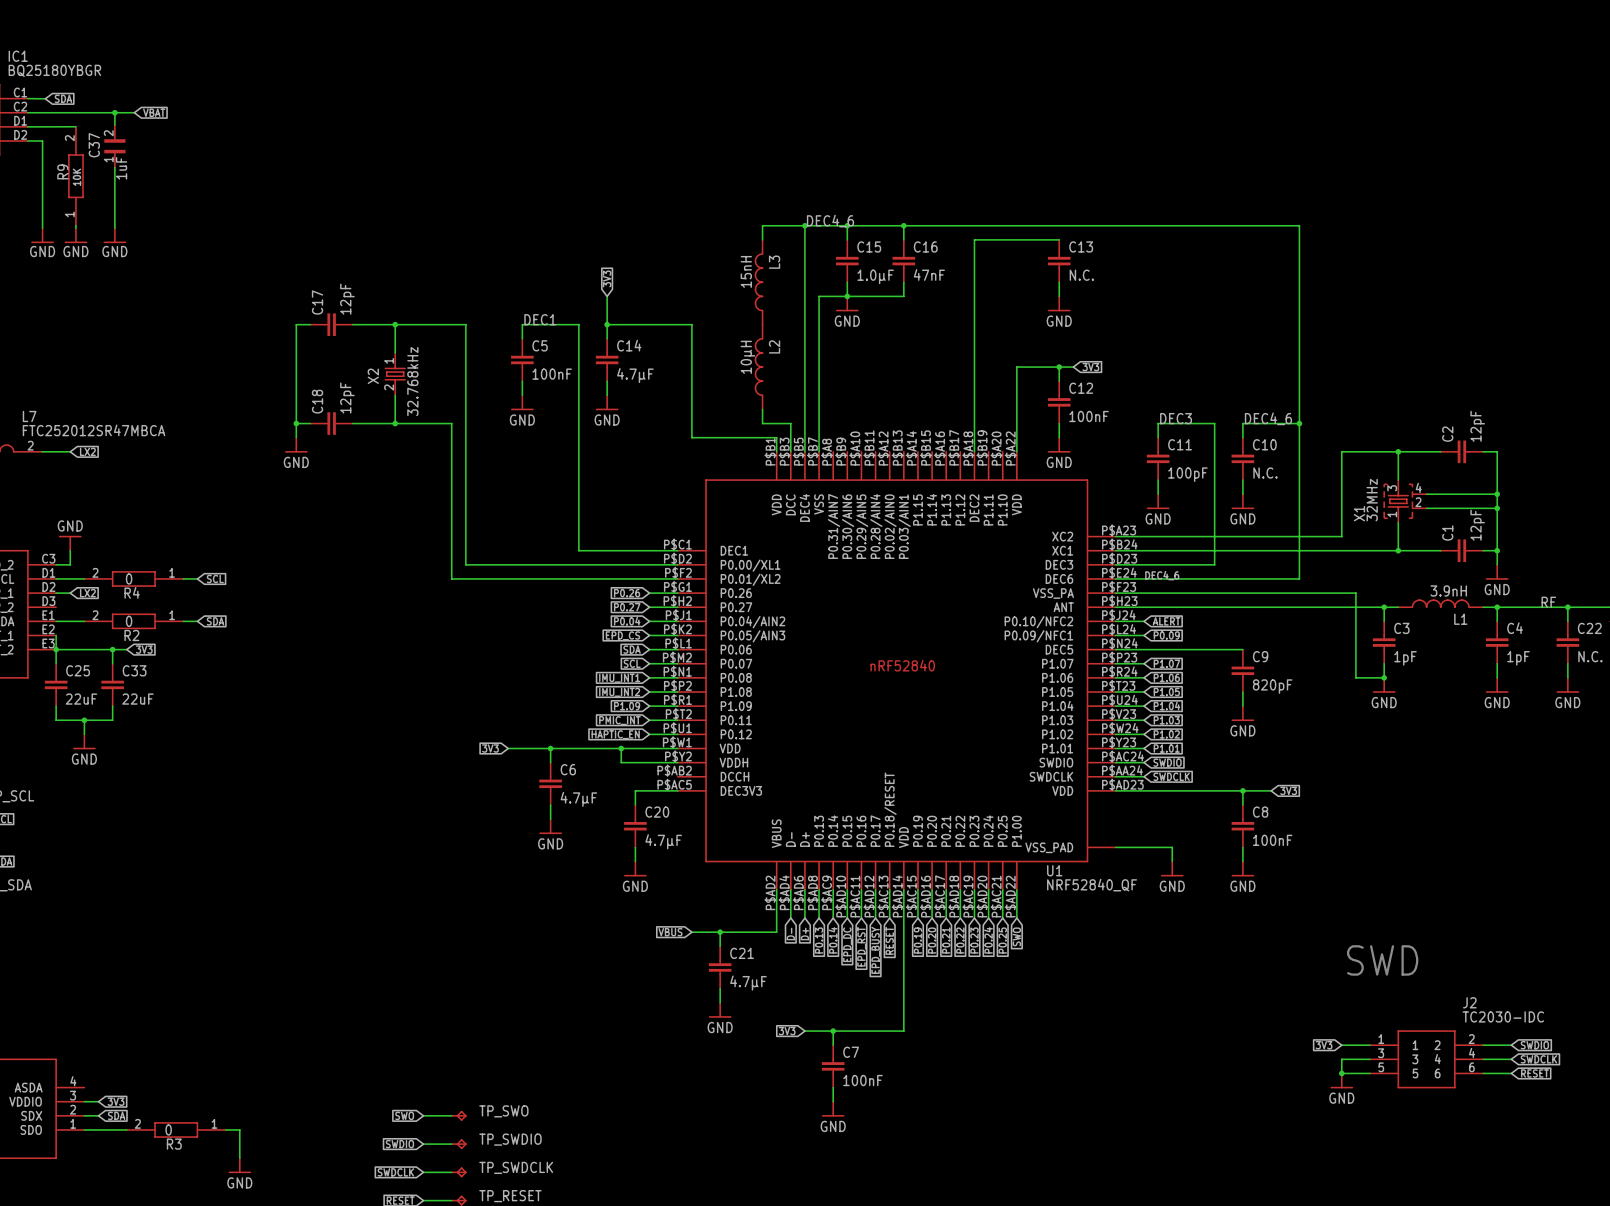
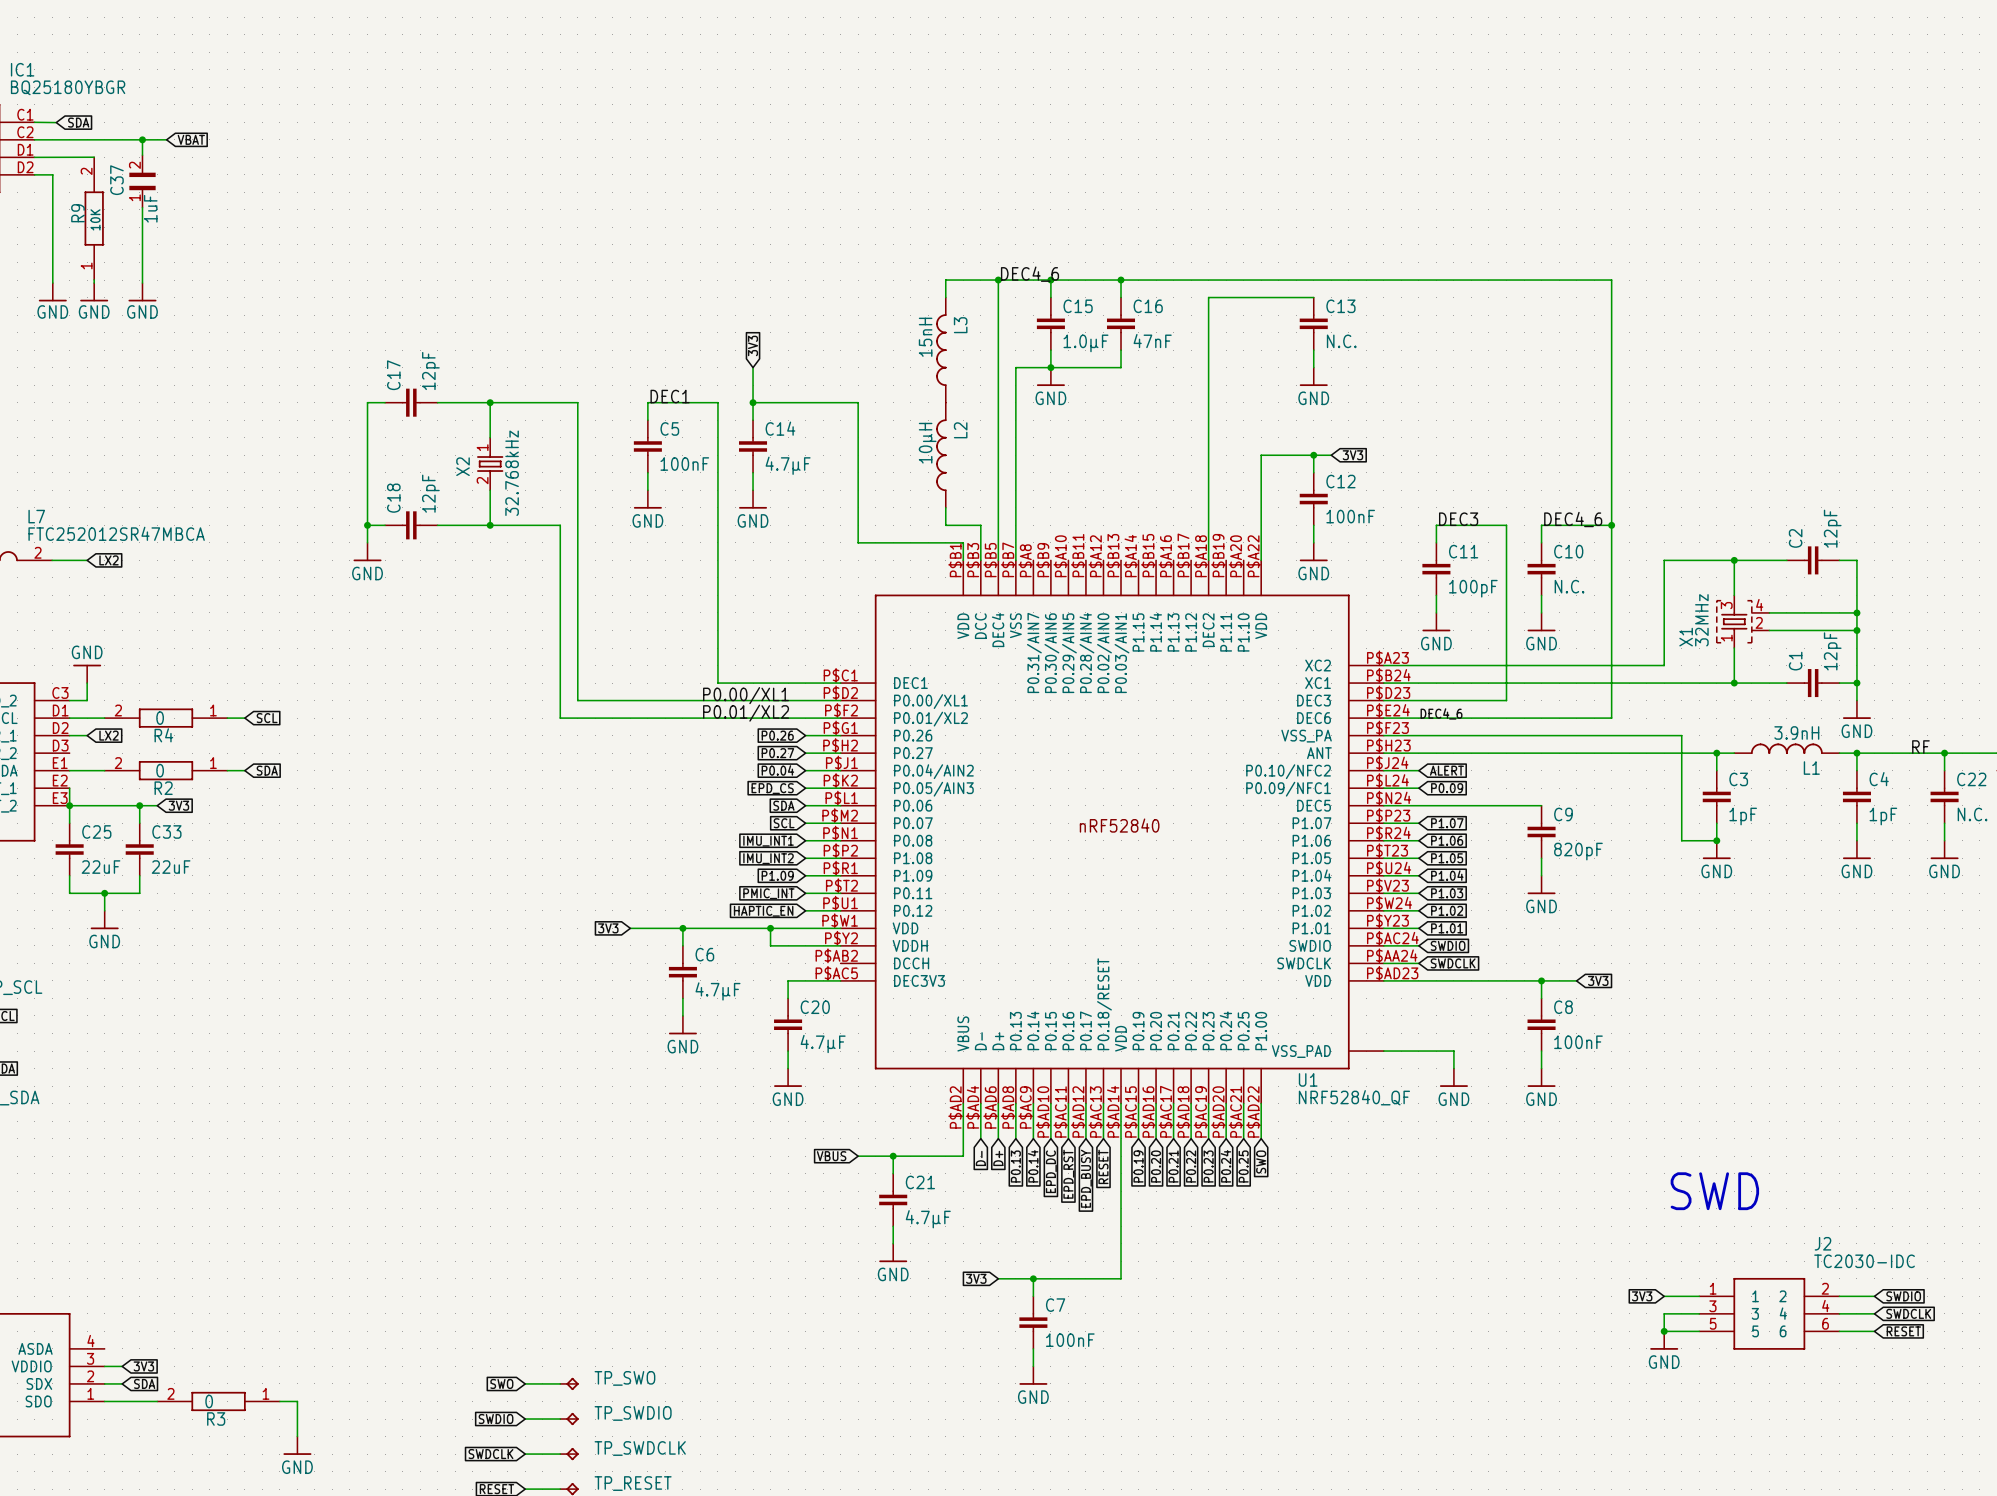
label: none -> P0.00/XL1 (746, 695)
label: none -> P0.01/XL2 (746, 713)

